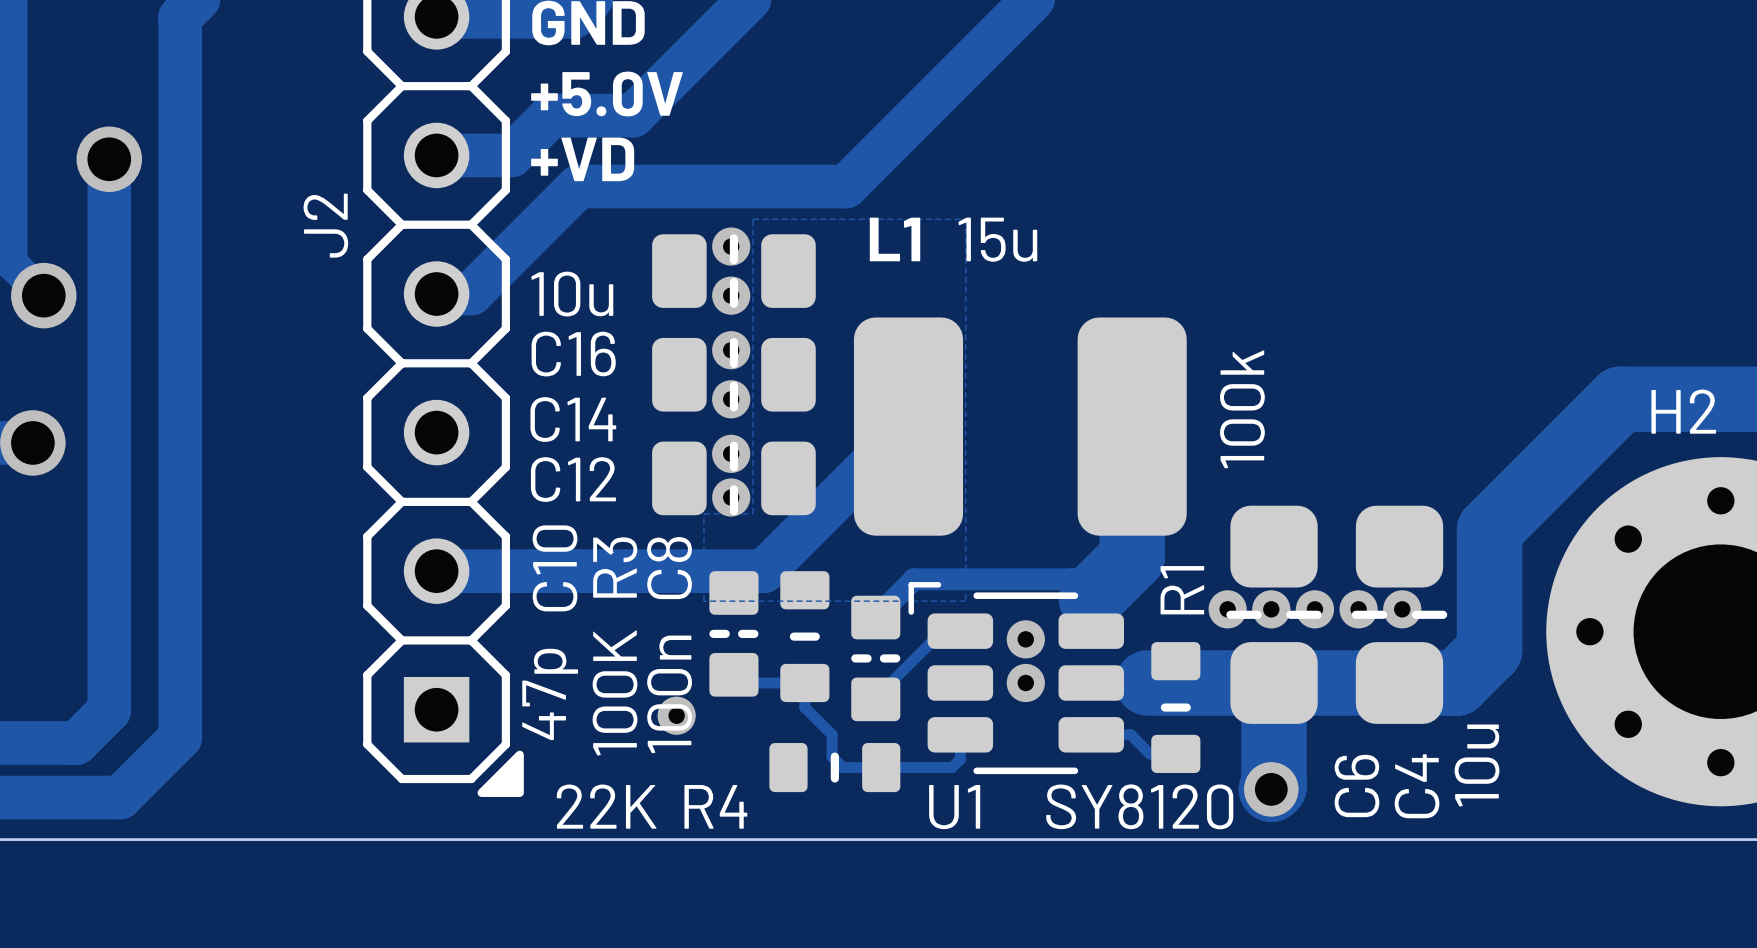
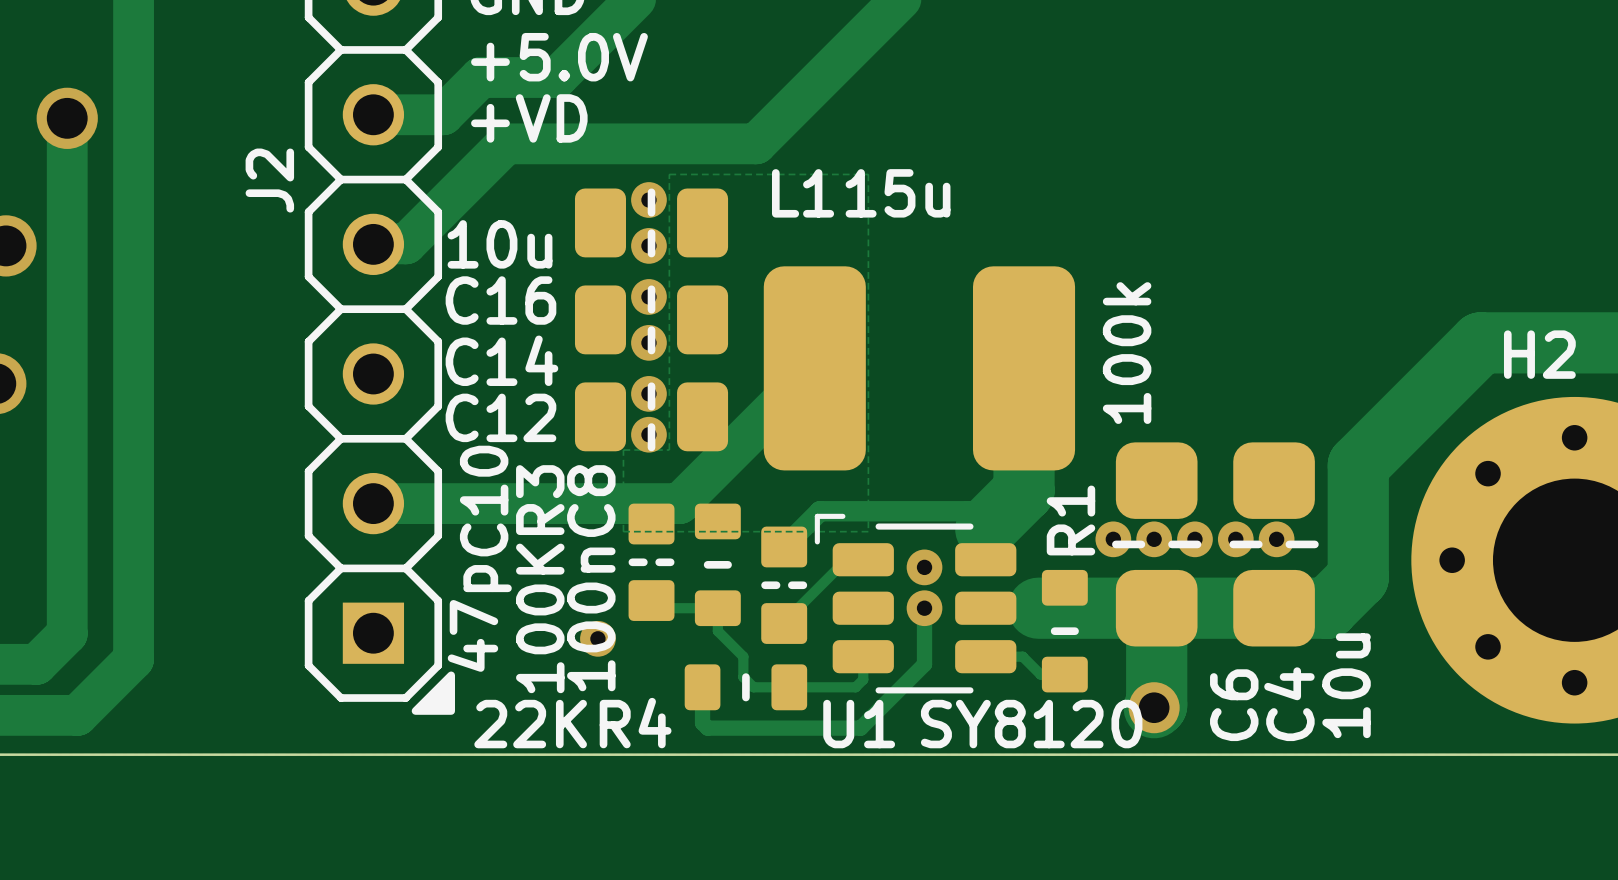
track: none -> (924, 608) (924, 664) (860, 728) (707, 728) (702, 723) (702, 687)

